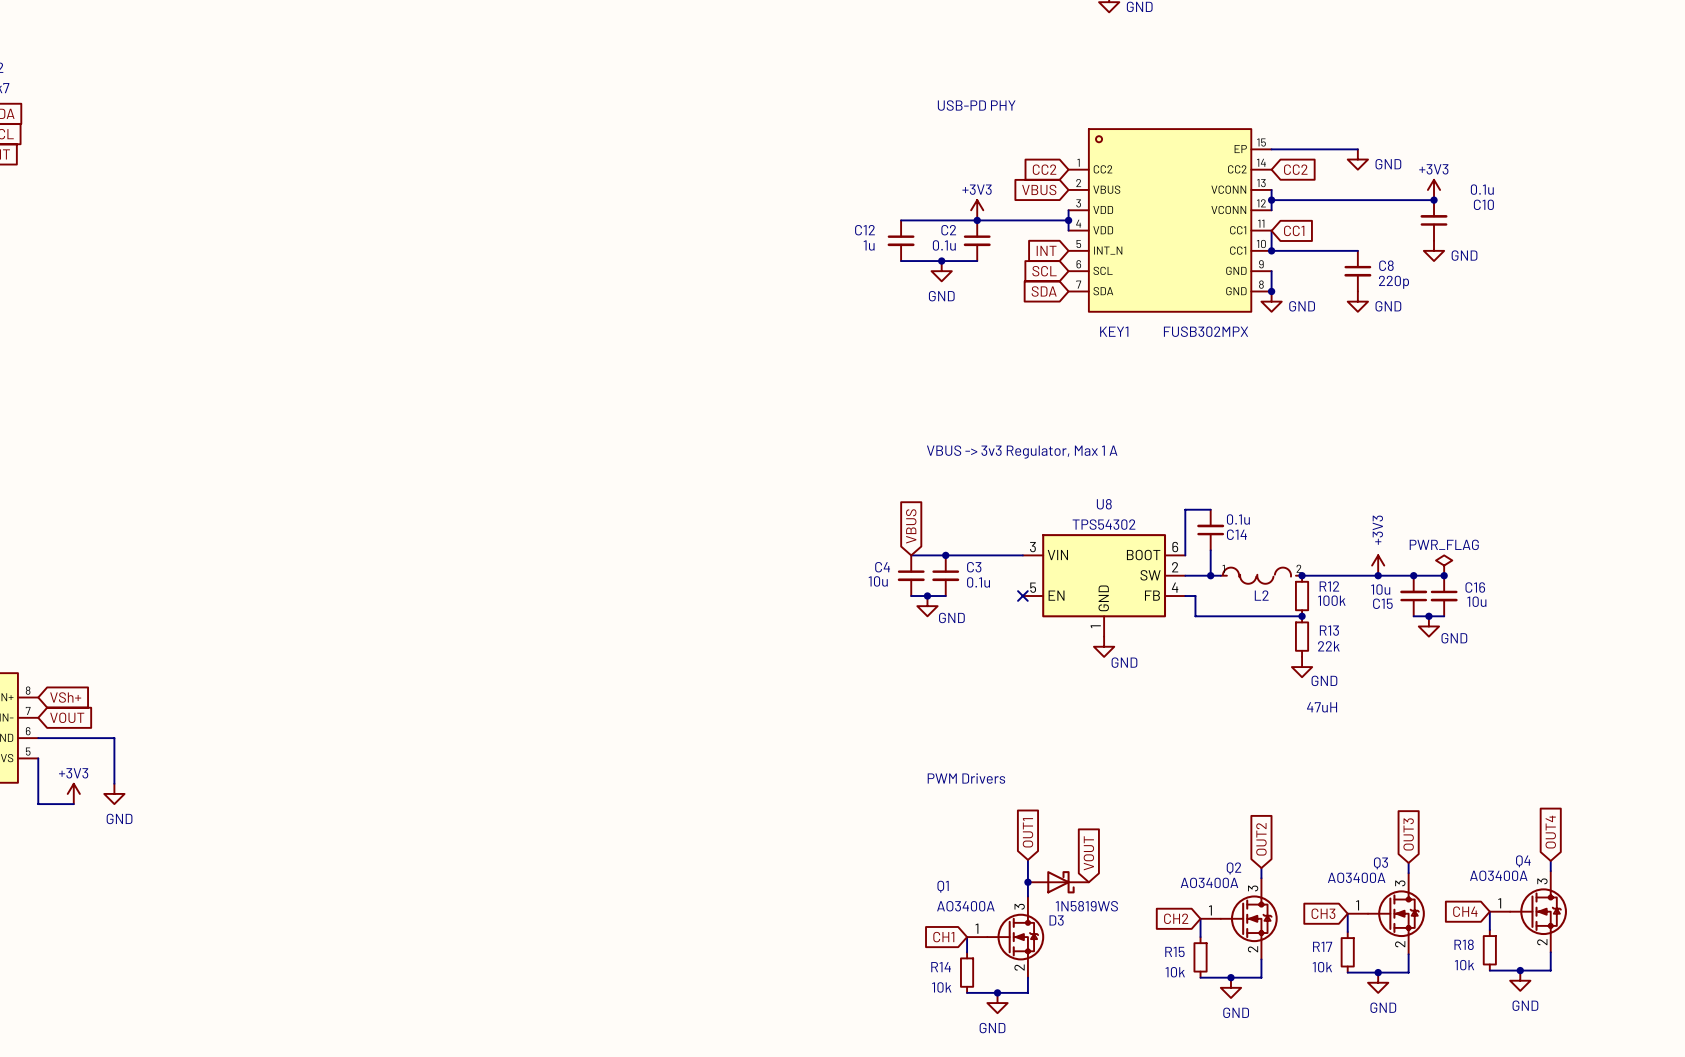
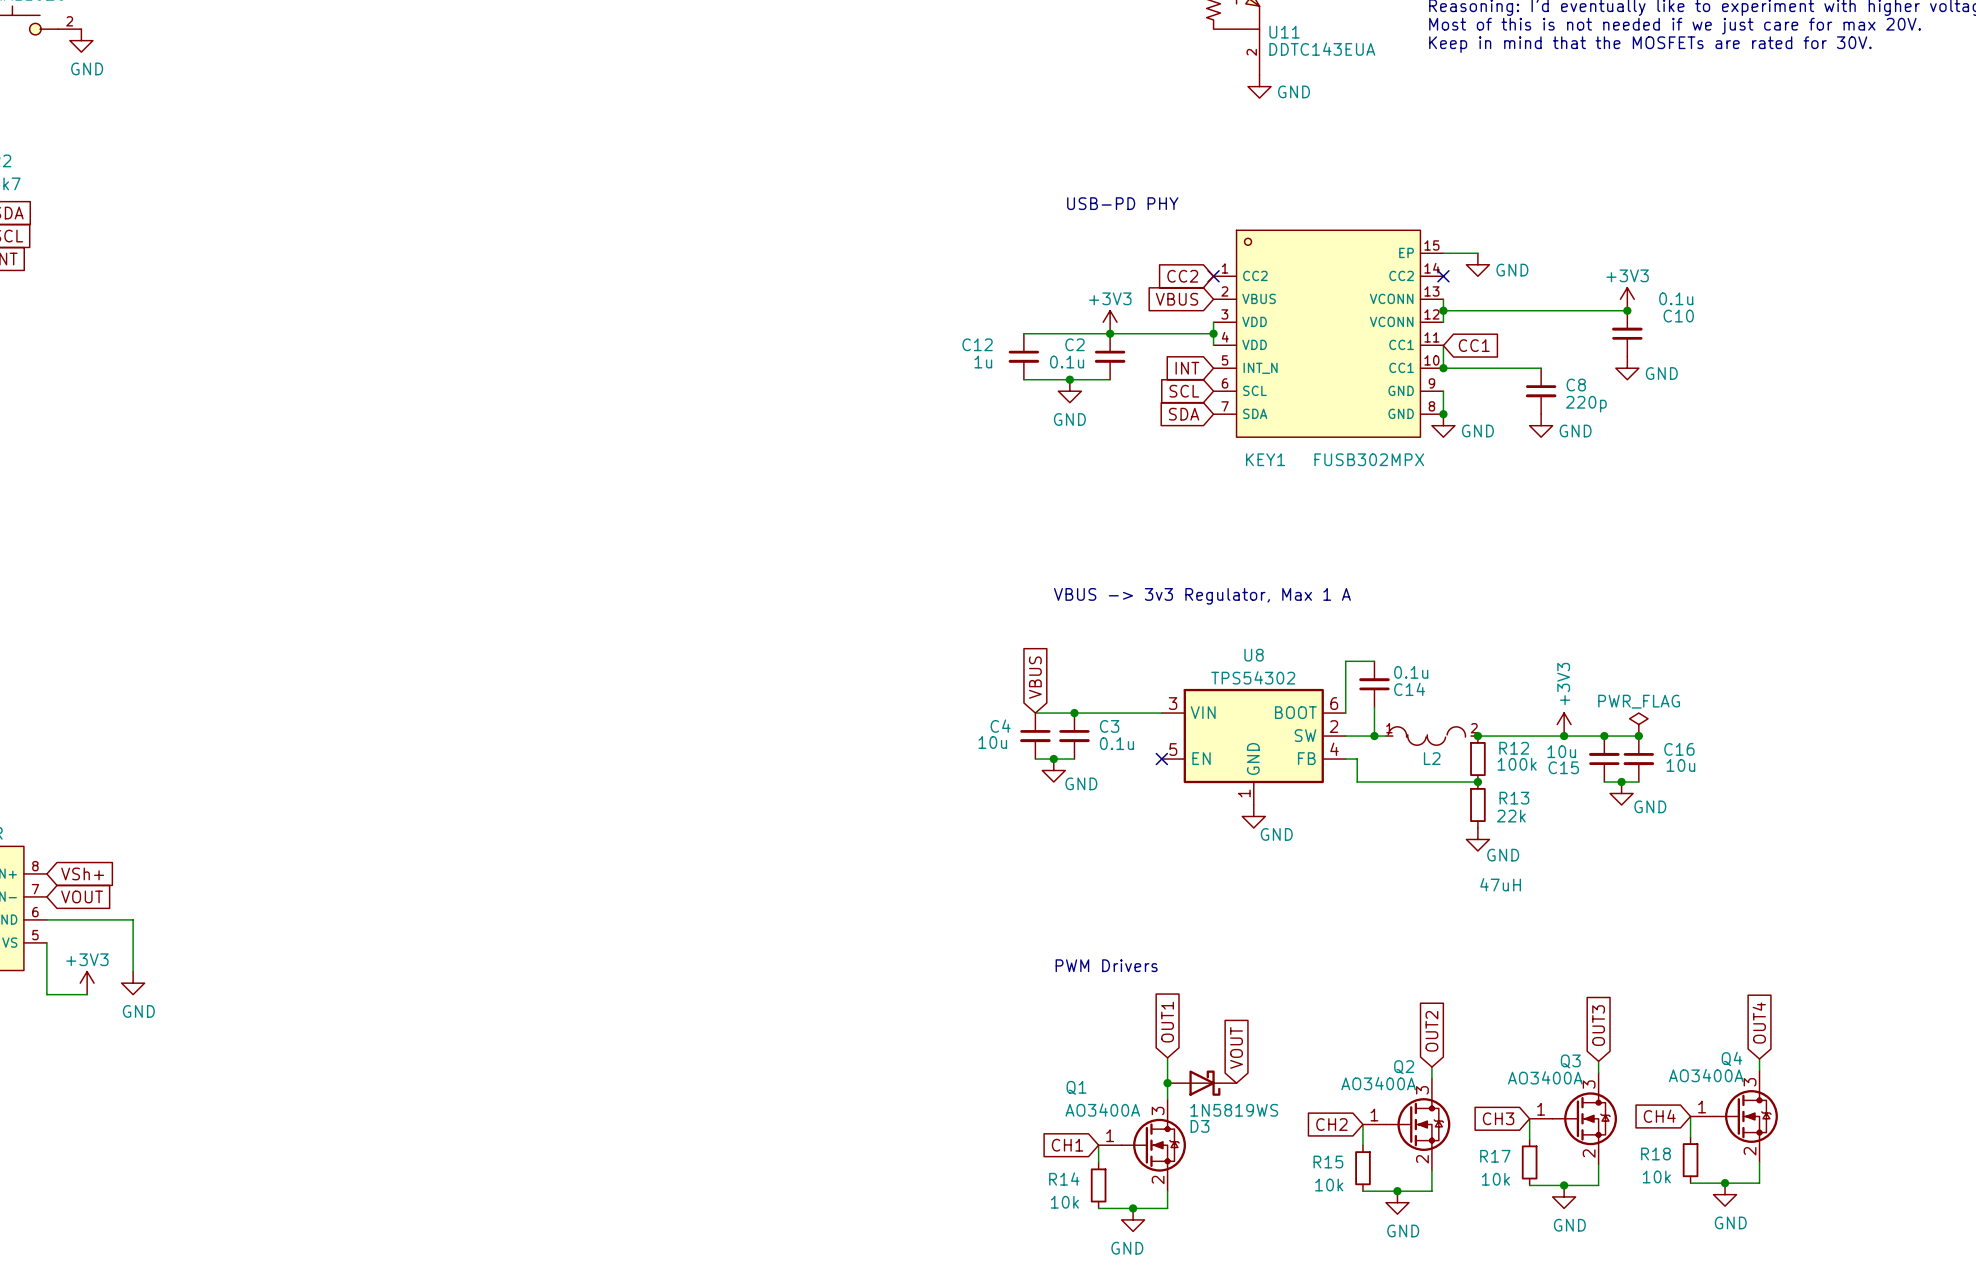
wire: (1302, 149) (1357, 149) -> none
power symbol position: GND (1357, 159) -> GND (1477, 264)
no-connect mark: none -> (1213, 276)
no-connect mark: none -> (1443, 276)
global label: CC2 (1295, 169) -> none

